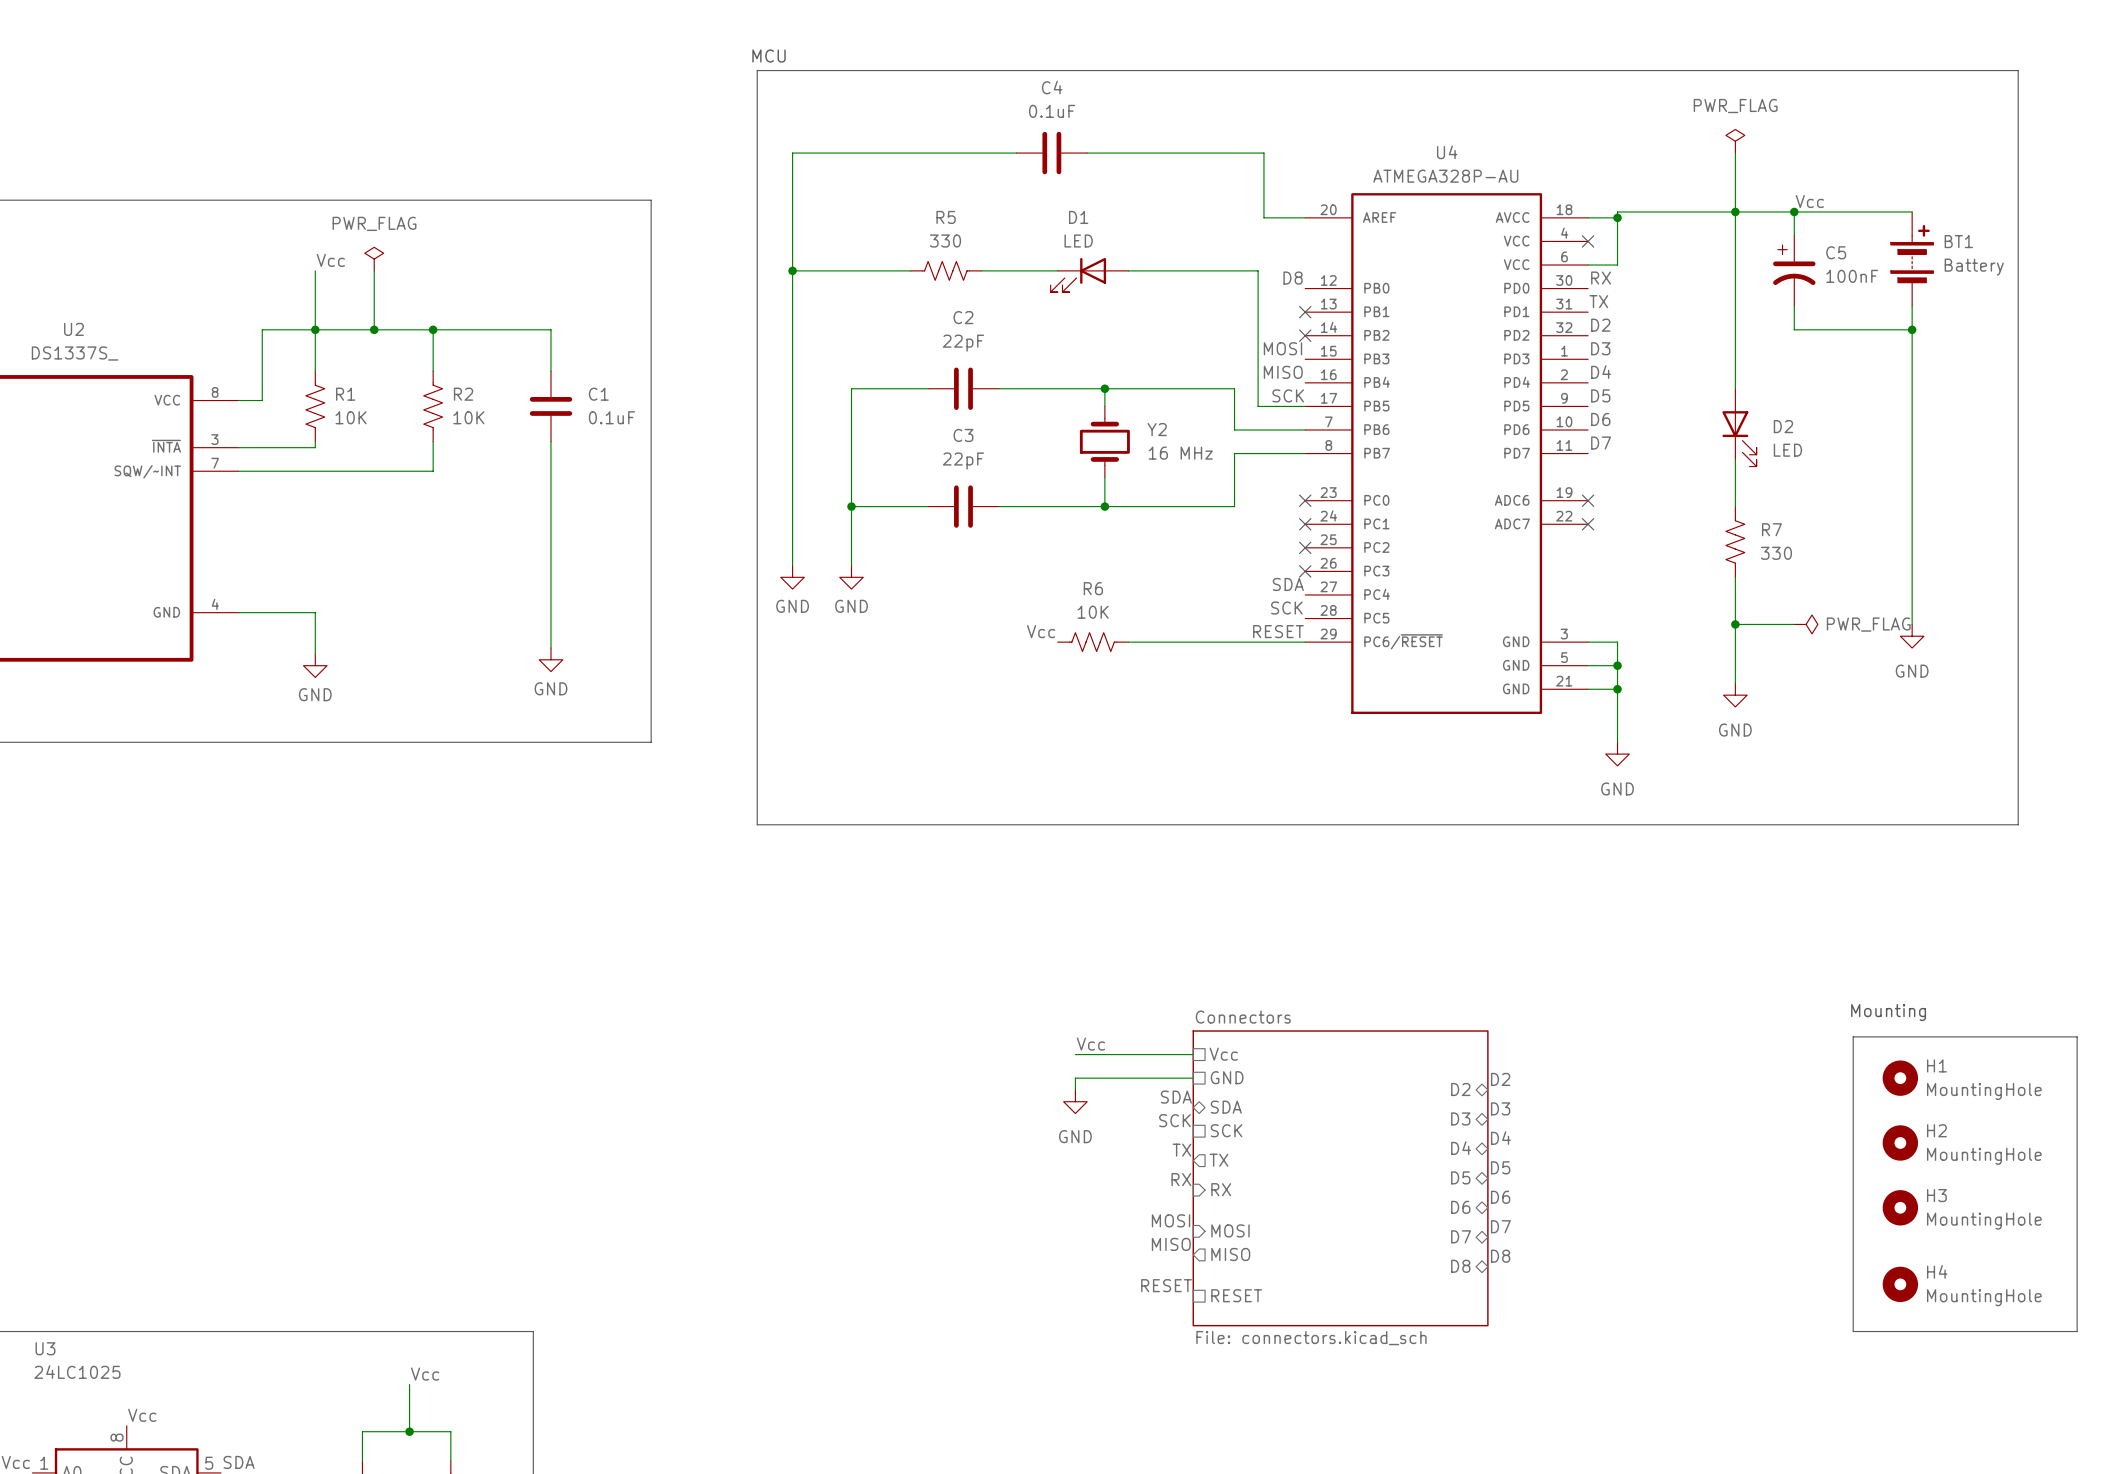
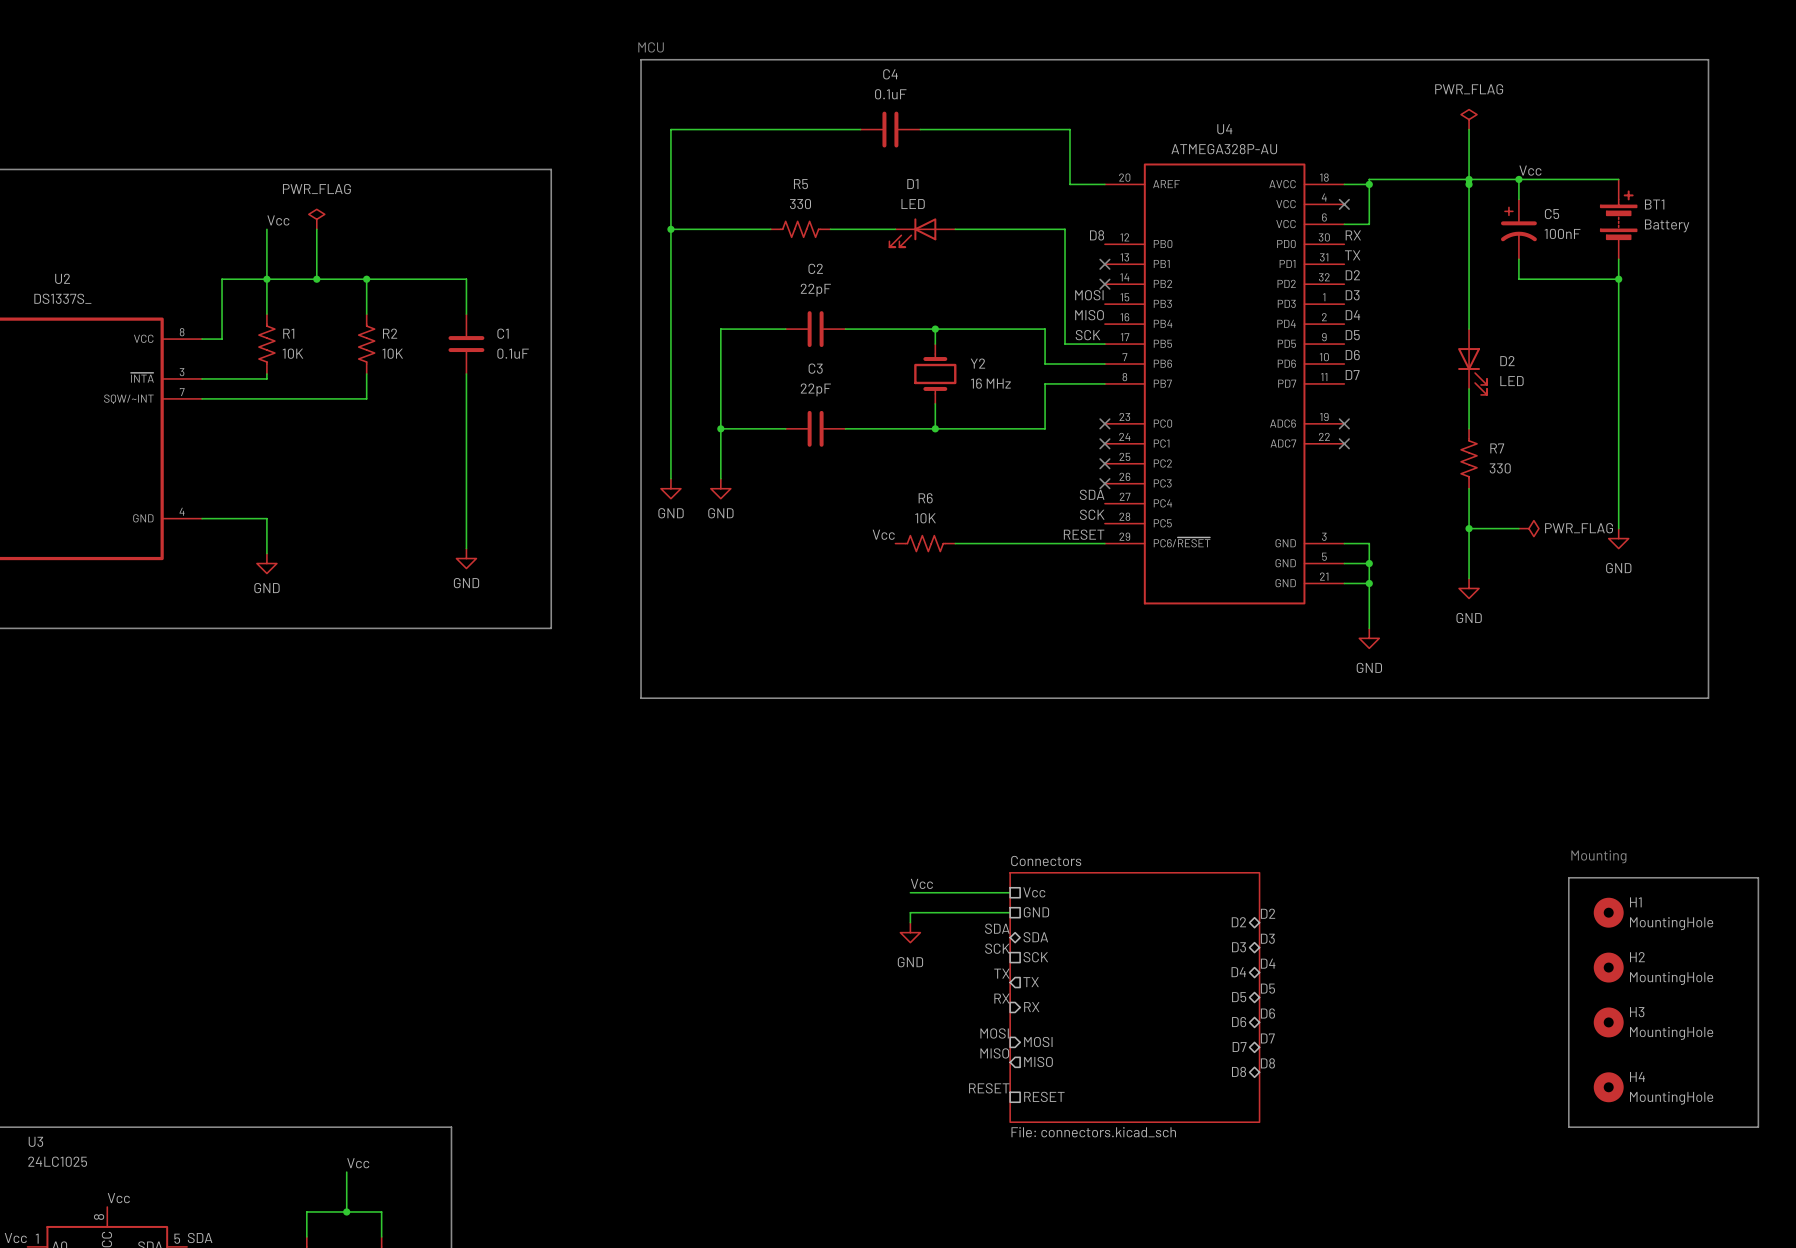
junction: none -> (1469, 184)

